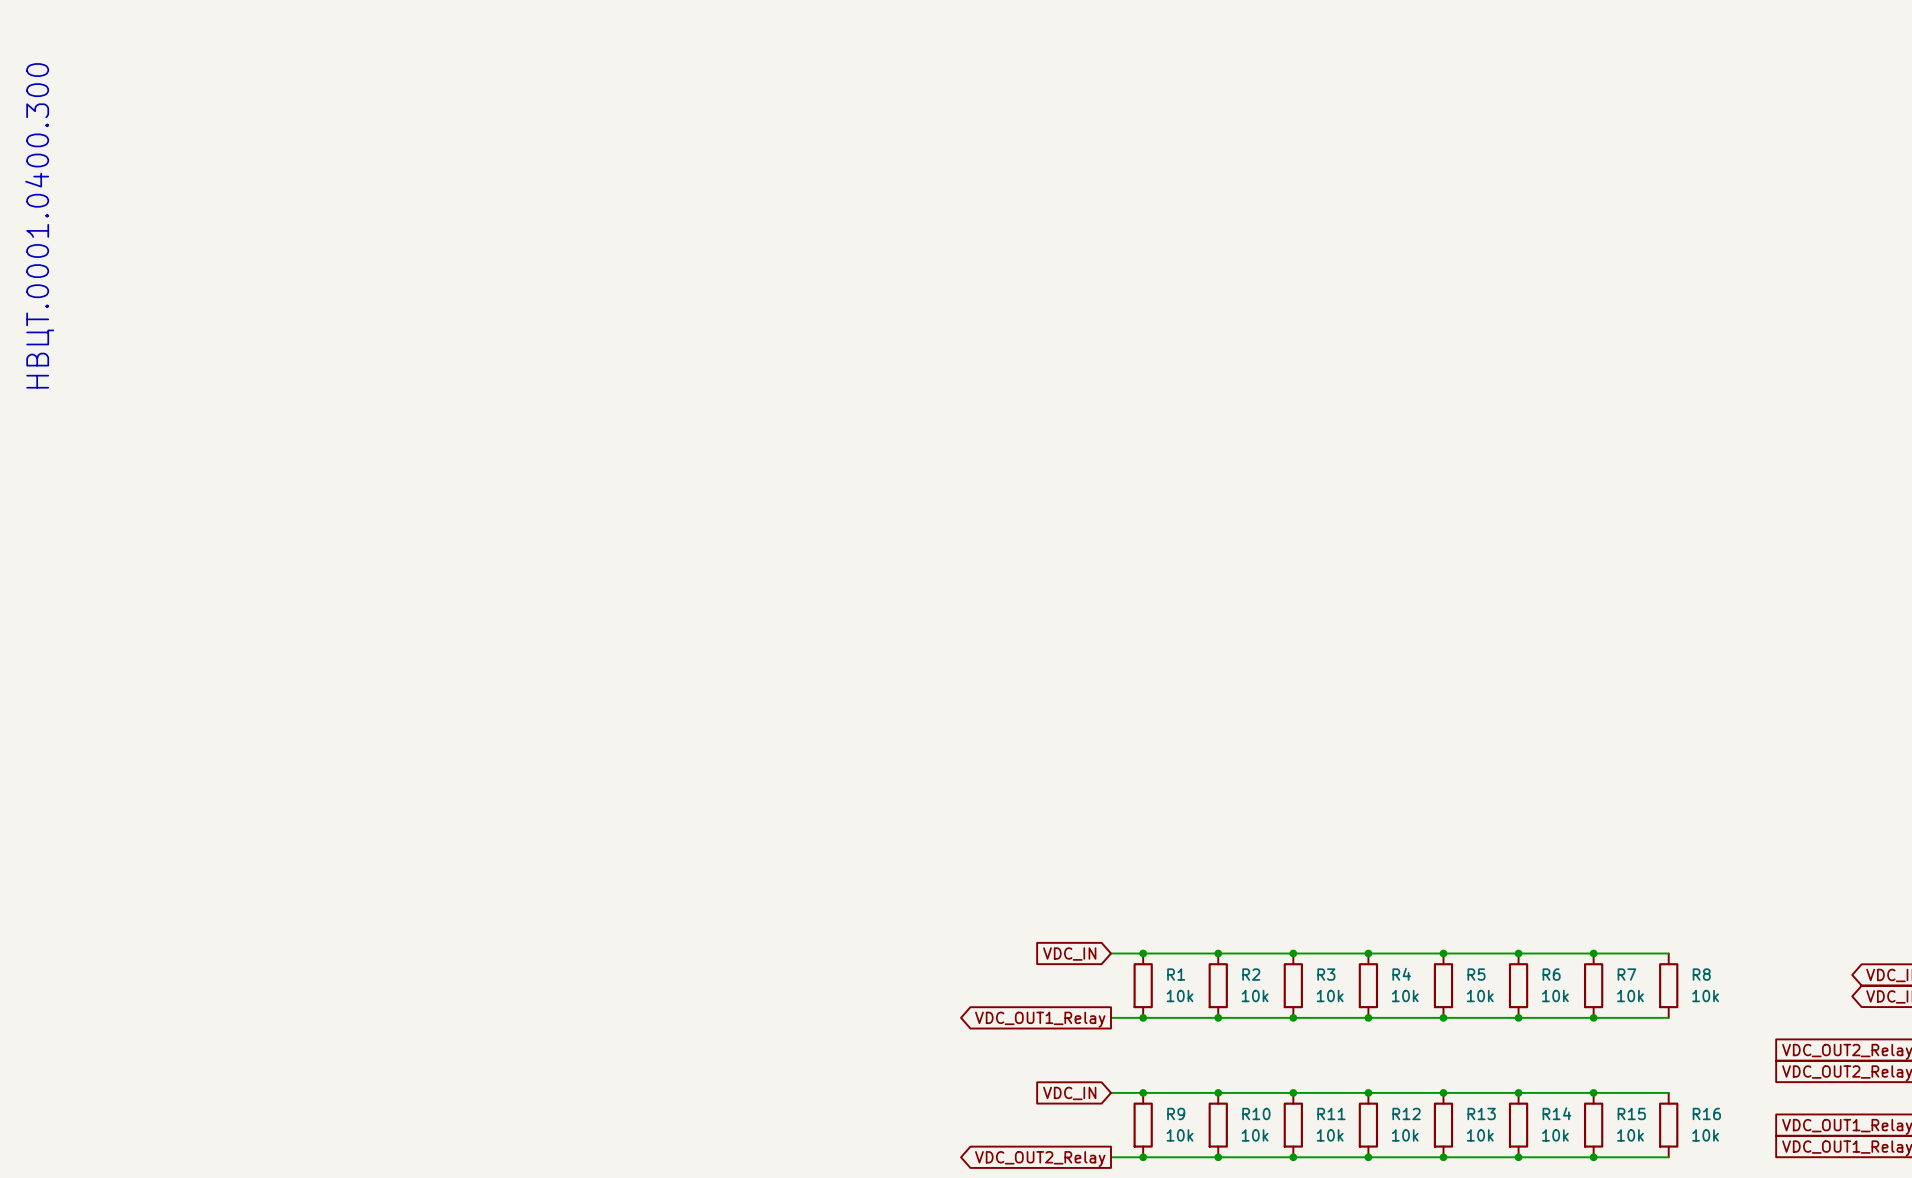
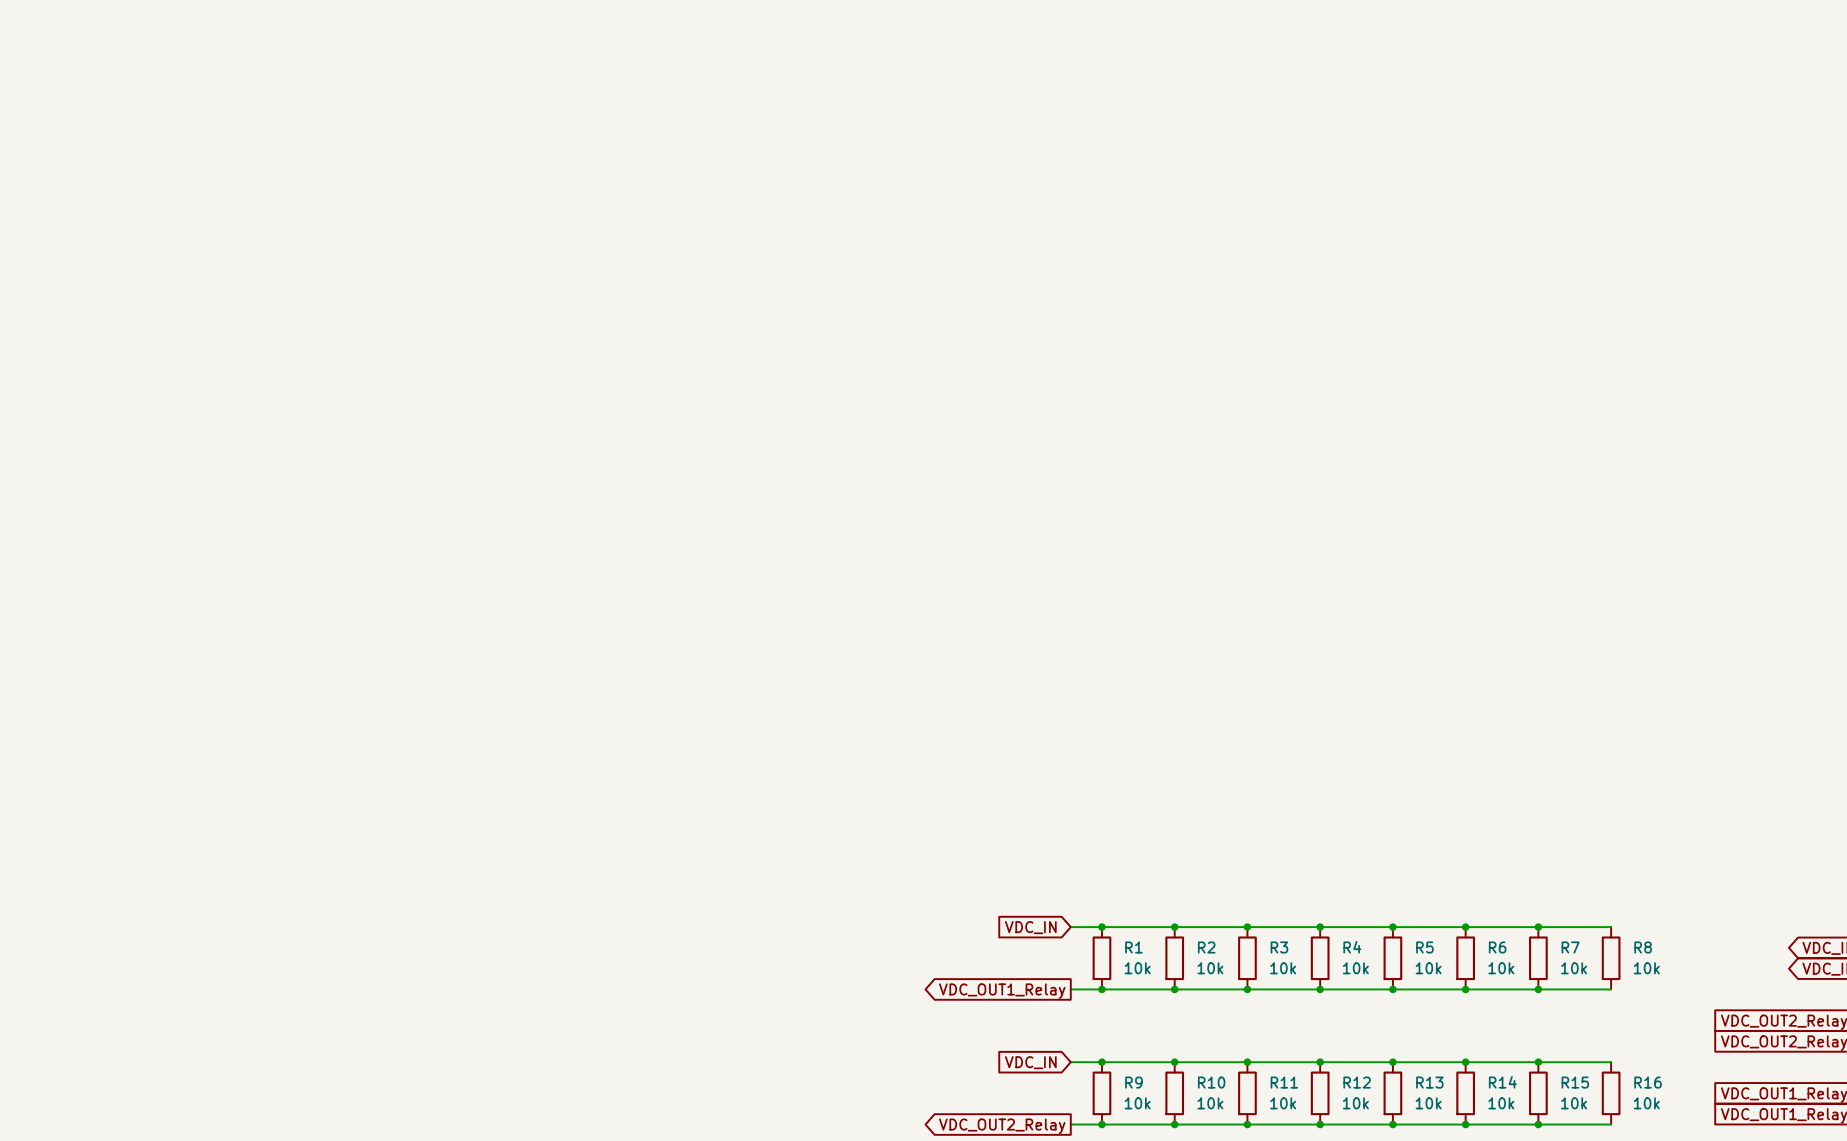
text: НВЦТ.0001.0400.300 (39, 225) -> none

